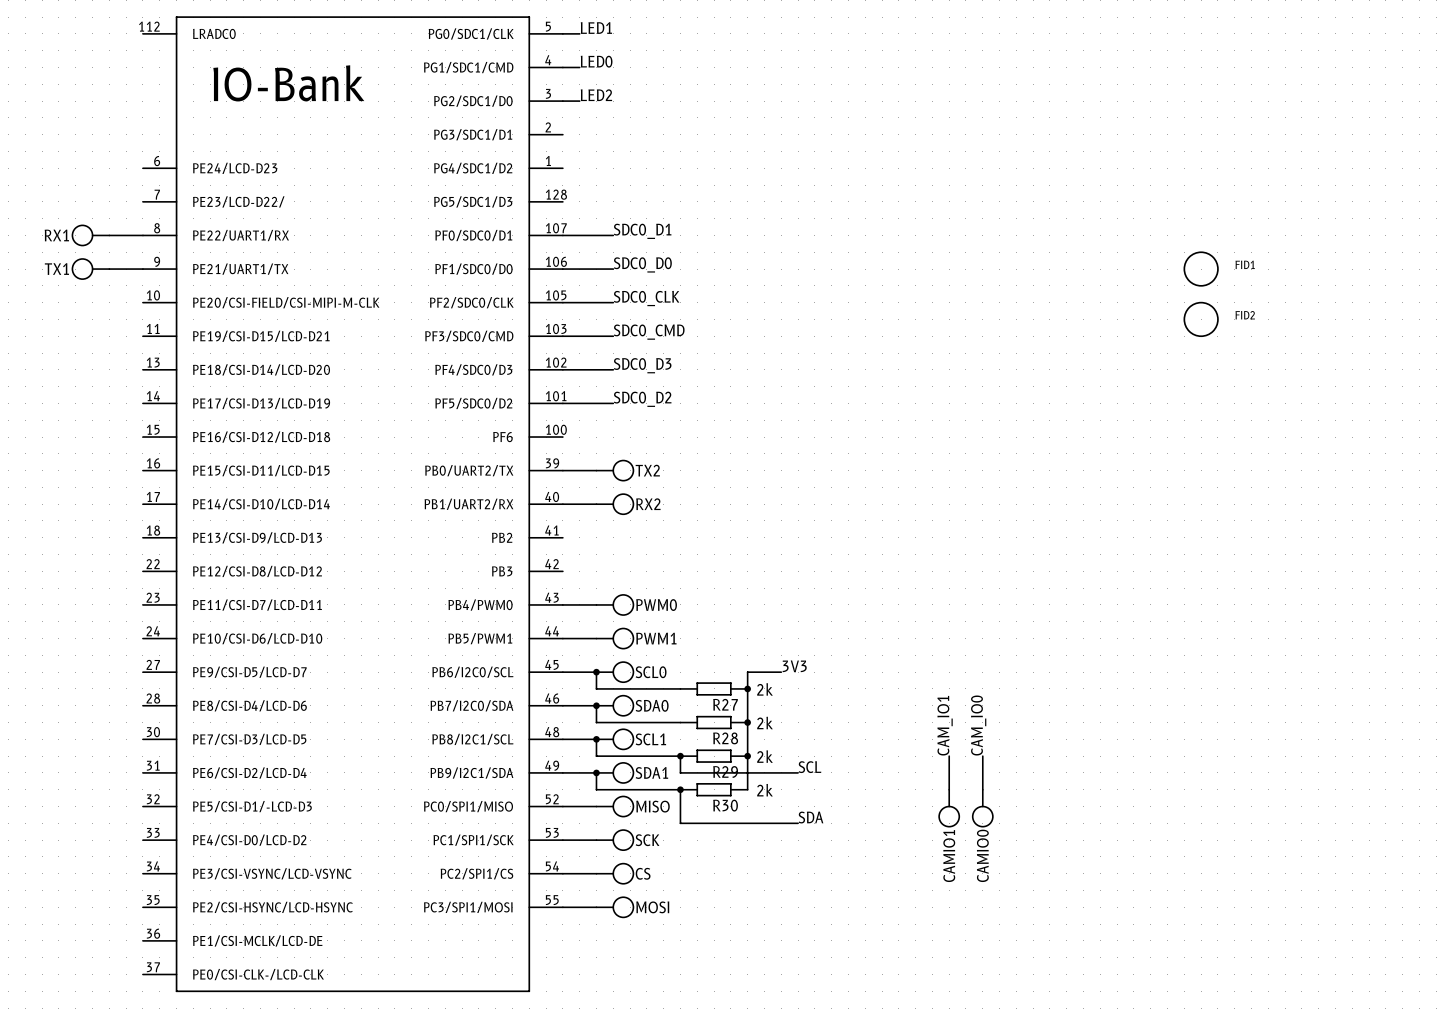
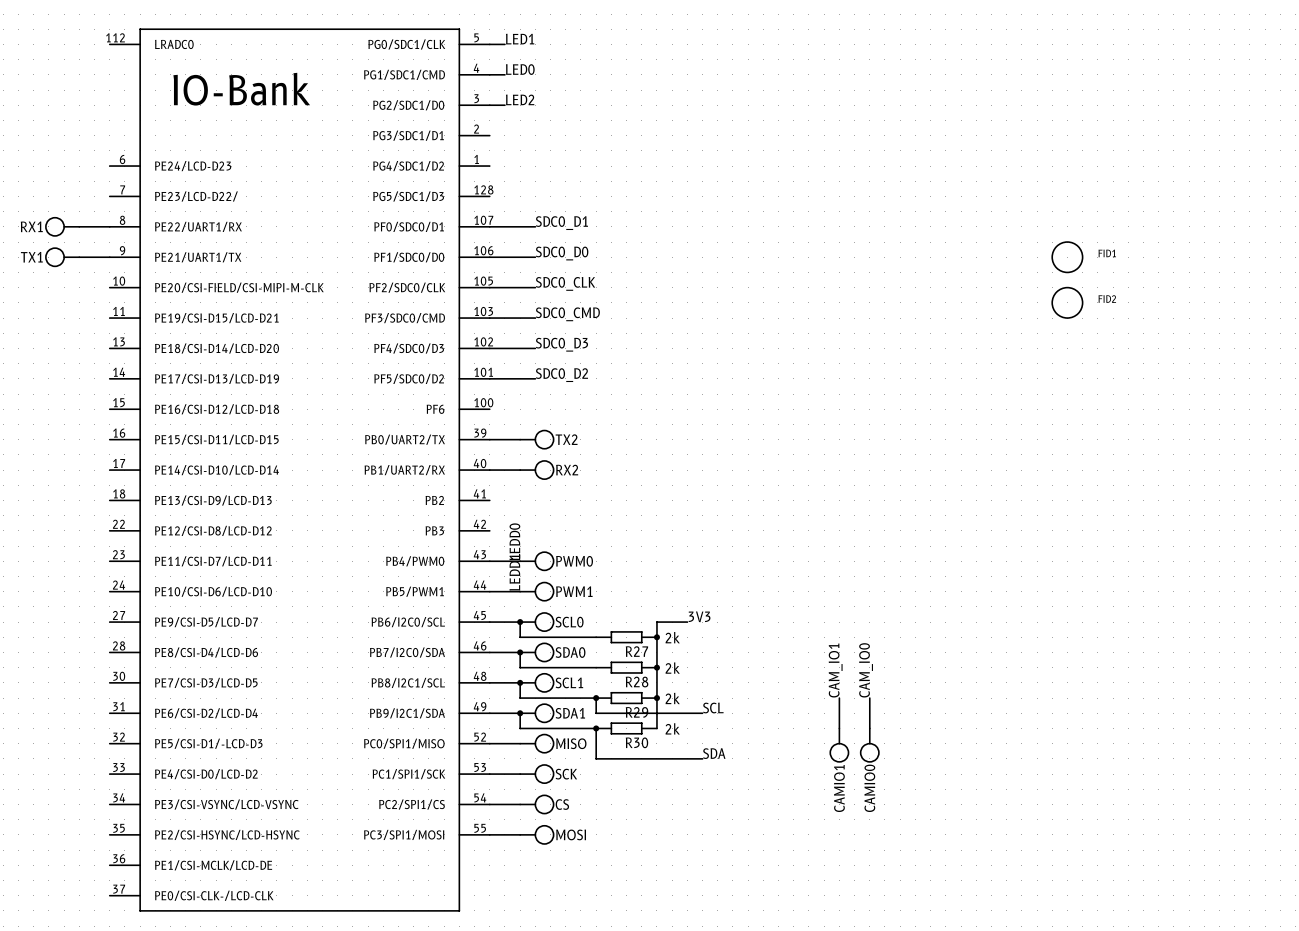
label: none -> LEDD0 (514, 541)
label: none -> LEDD1 (514, 572)

